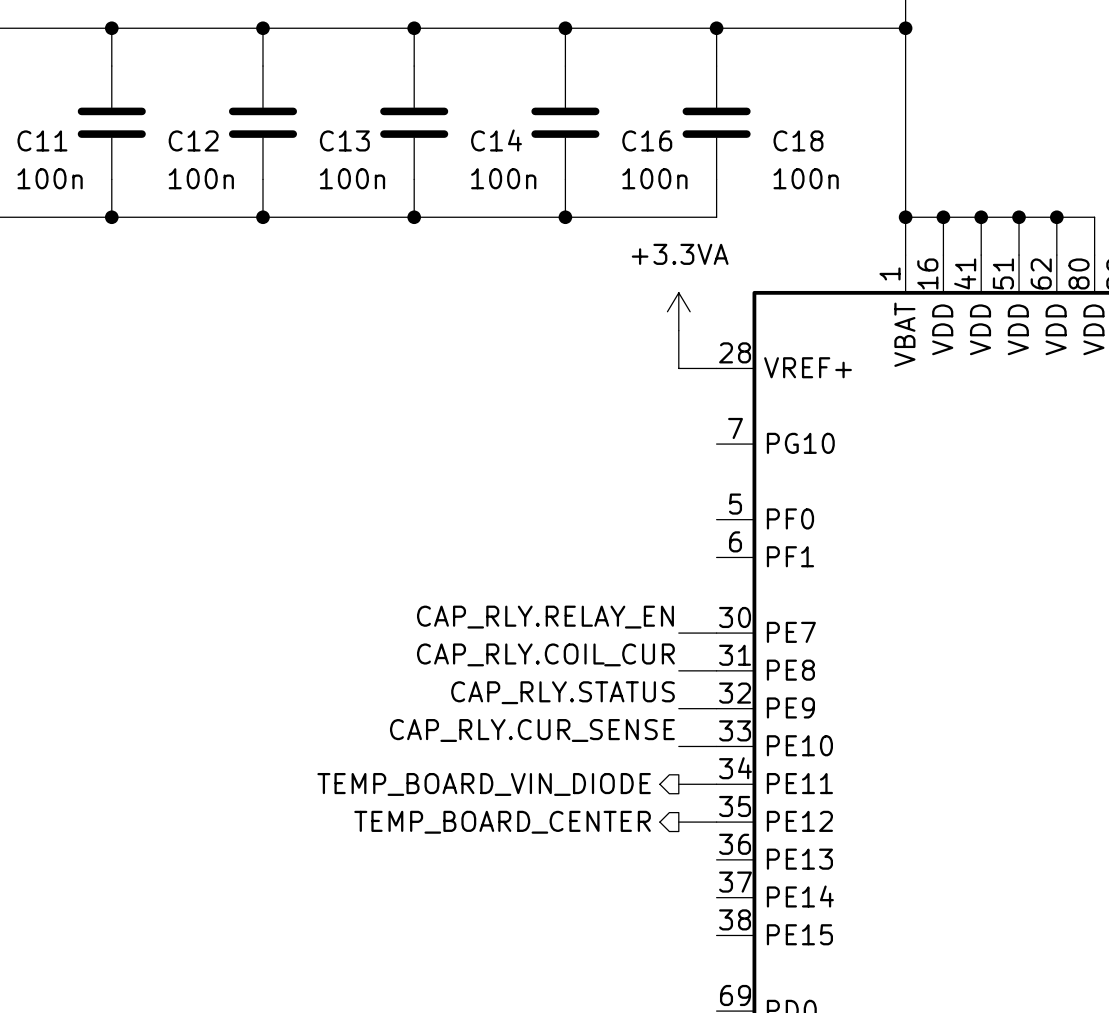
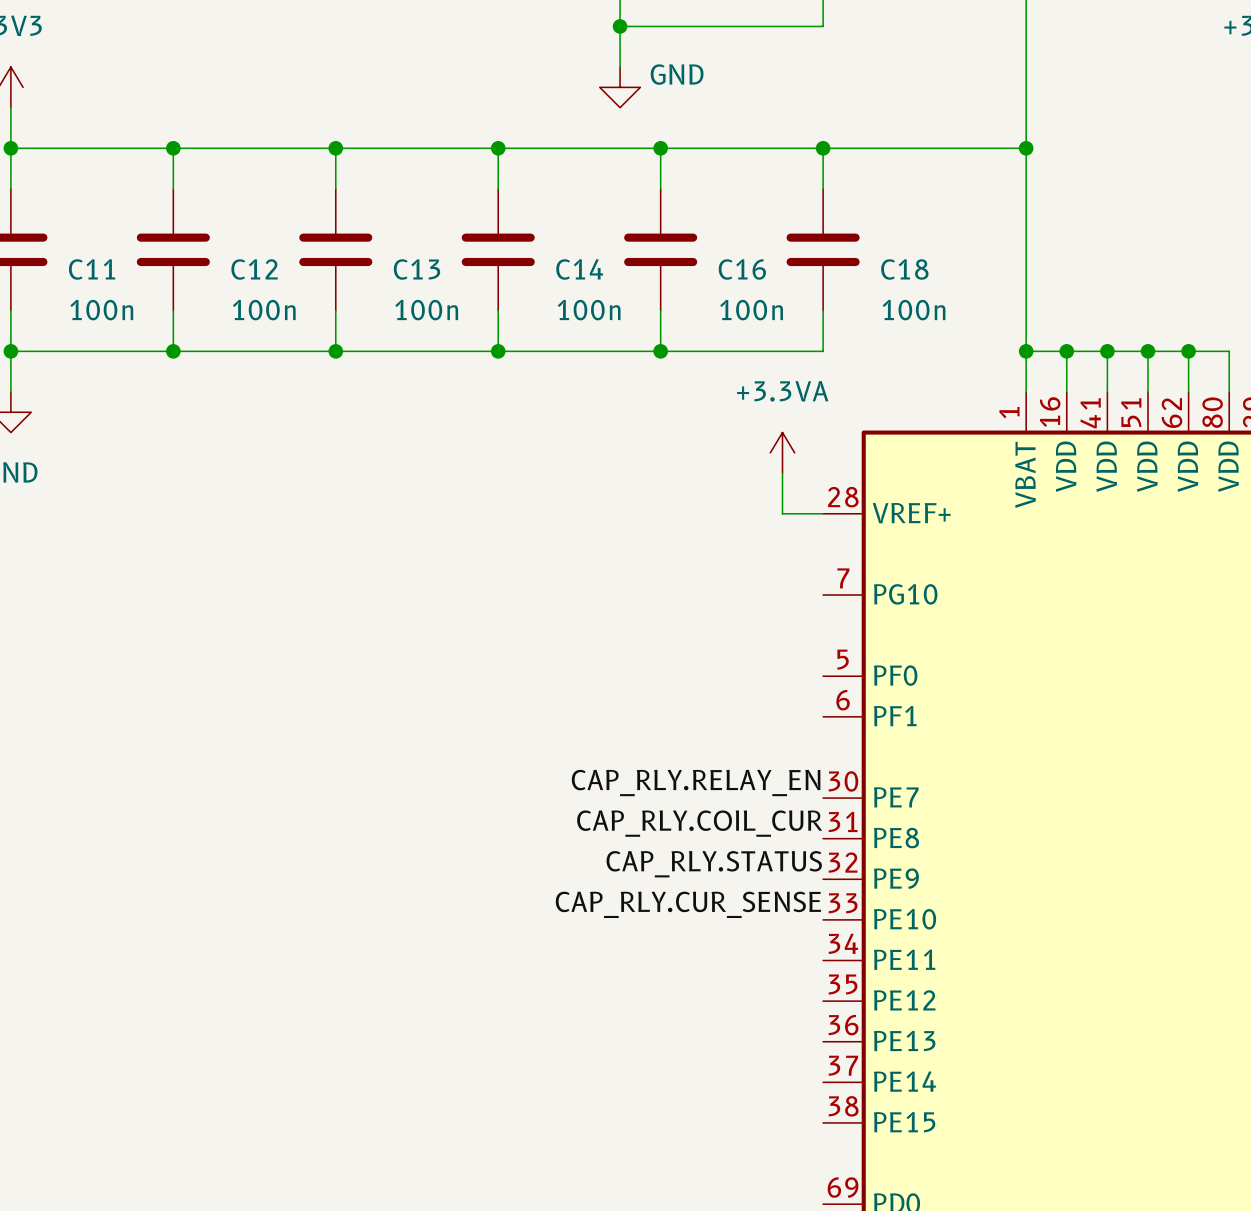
label position: CAP_RLY.RELAY_EN (545, 617) -> CAP_RLY.RELAY_EN (696, 782)
wire: (678, 633) (716, 633) -> none
label position: CAP_RLY.COIL_CUR (545, 654) -> CAP_RLY.COIL_CUR (699, 823)
wire: (678, 670) (716, 670) -> none
label position: CAP_RLY.STATUS (563, 692) -> CAP_RLY.STATUS (714, 864)
wire: (678, 708) (716, 708) -> none
label position: CAP_RLY.CUR_SENSE (532, 730) -> CAP_RLY.CUR_SENSE (688, 904)
wire: (678, 746) (716, 746) -> none
hierarchical label: TEMP_BOARD_VIN_DIODE (484, 784) -> none
wire: (678, 784) (716, 784) -> none
hierarchical label: TEMP_BOARD_CENTER (502, 822) -> none
wire: (678, 822) (716, 822) -> none

